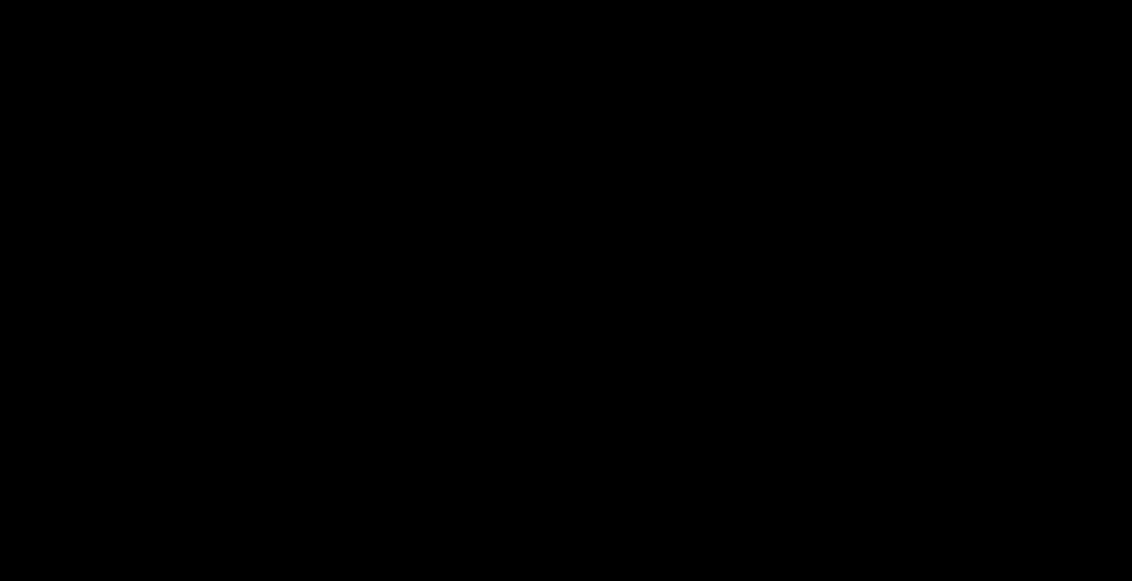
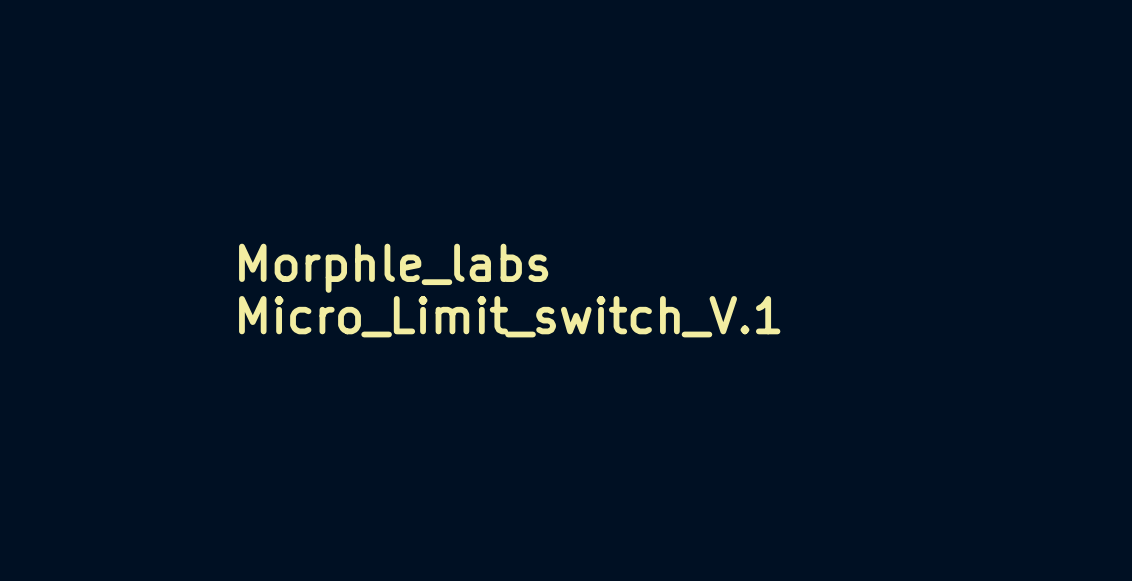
text: none -> Morphle_labs (393, 268)
text: none -> Micro_Limit_switch_V.1 (509, 316)

